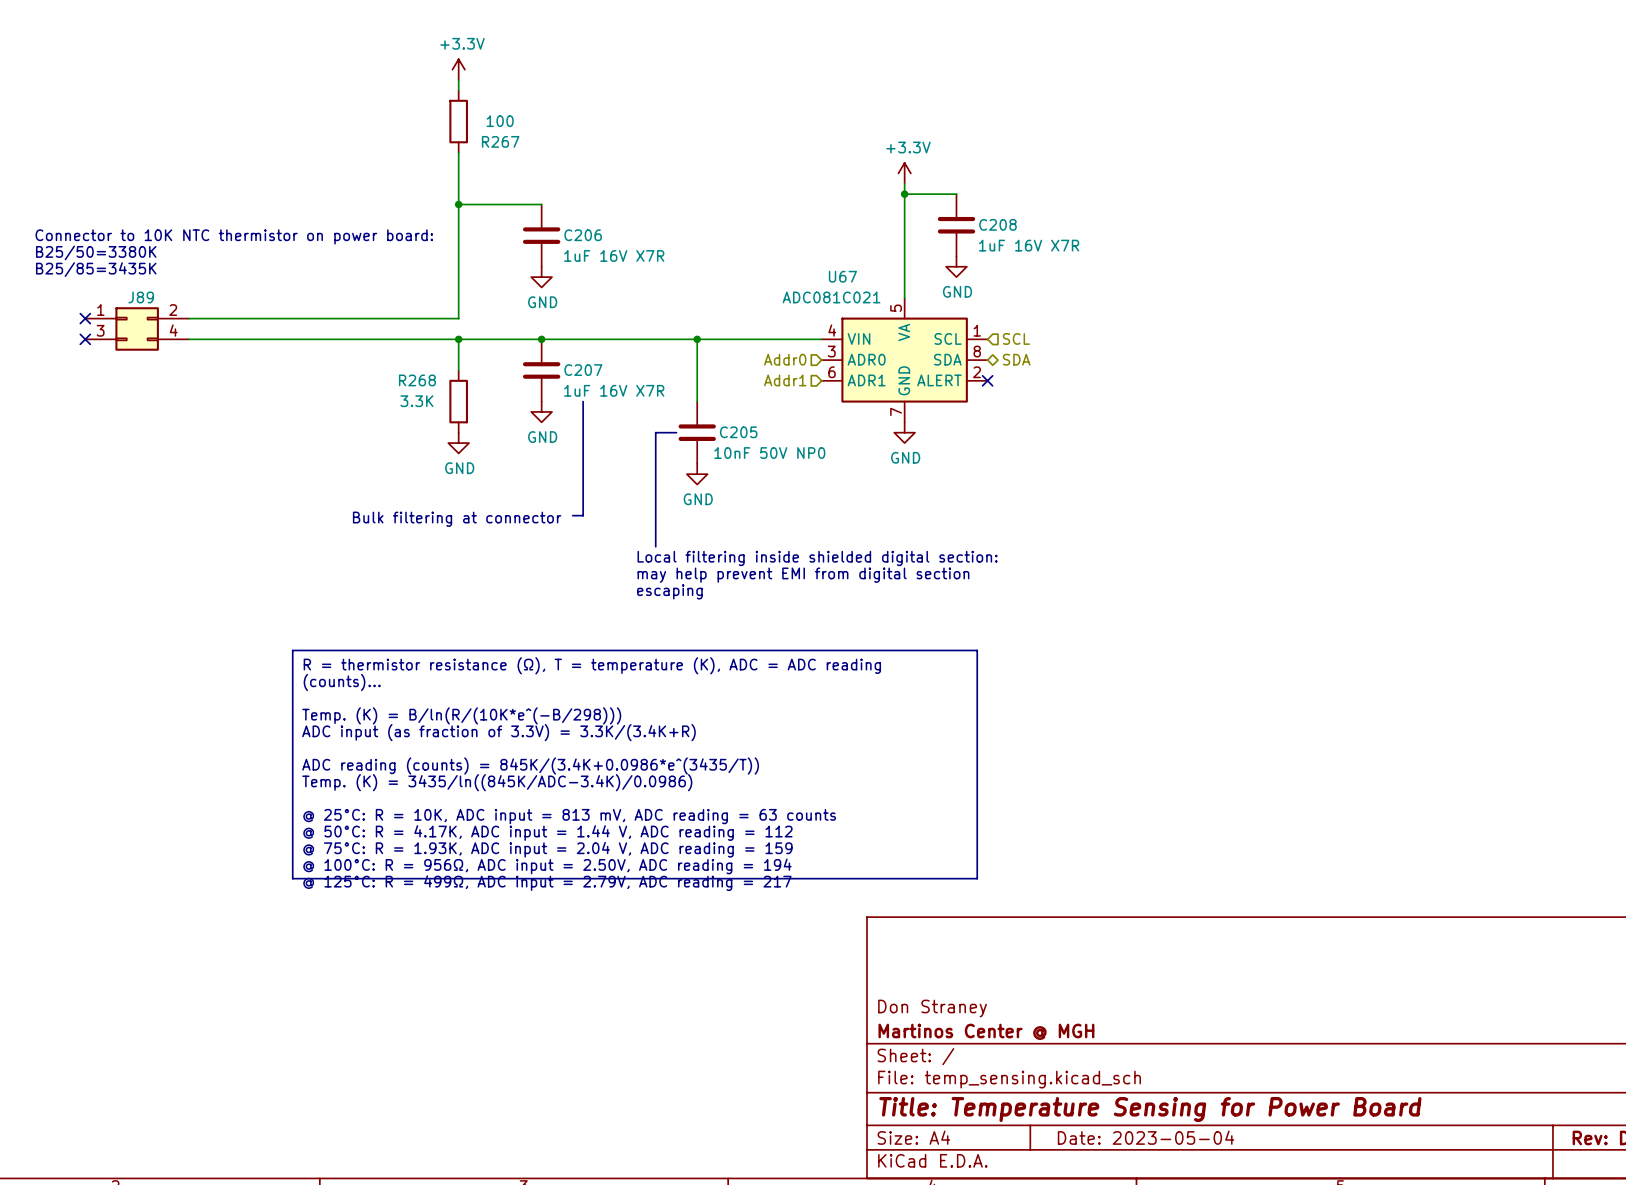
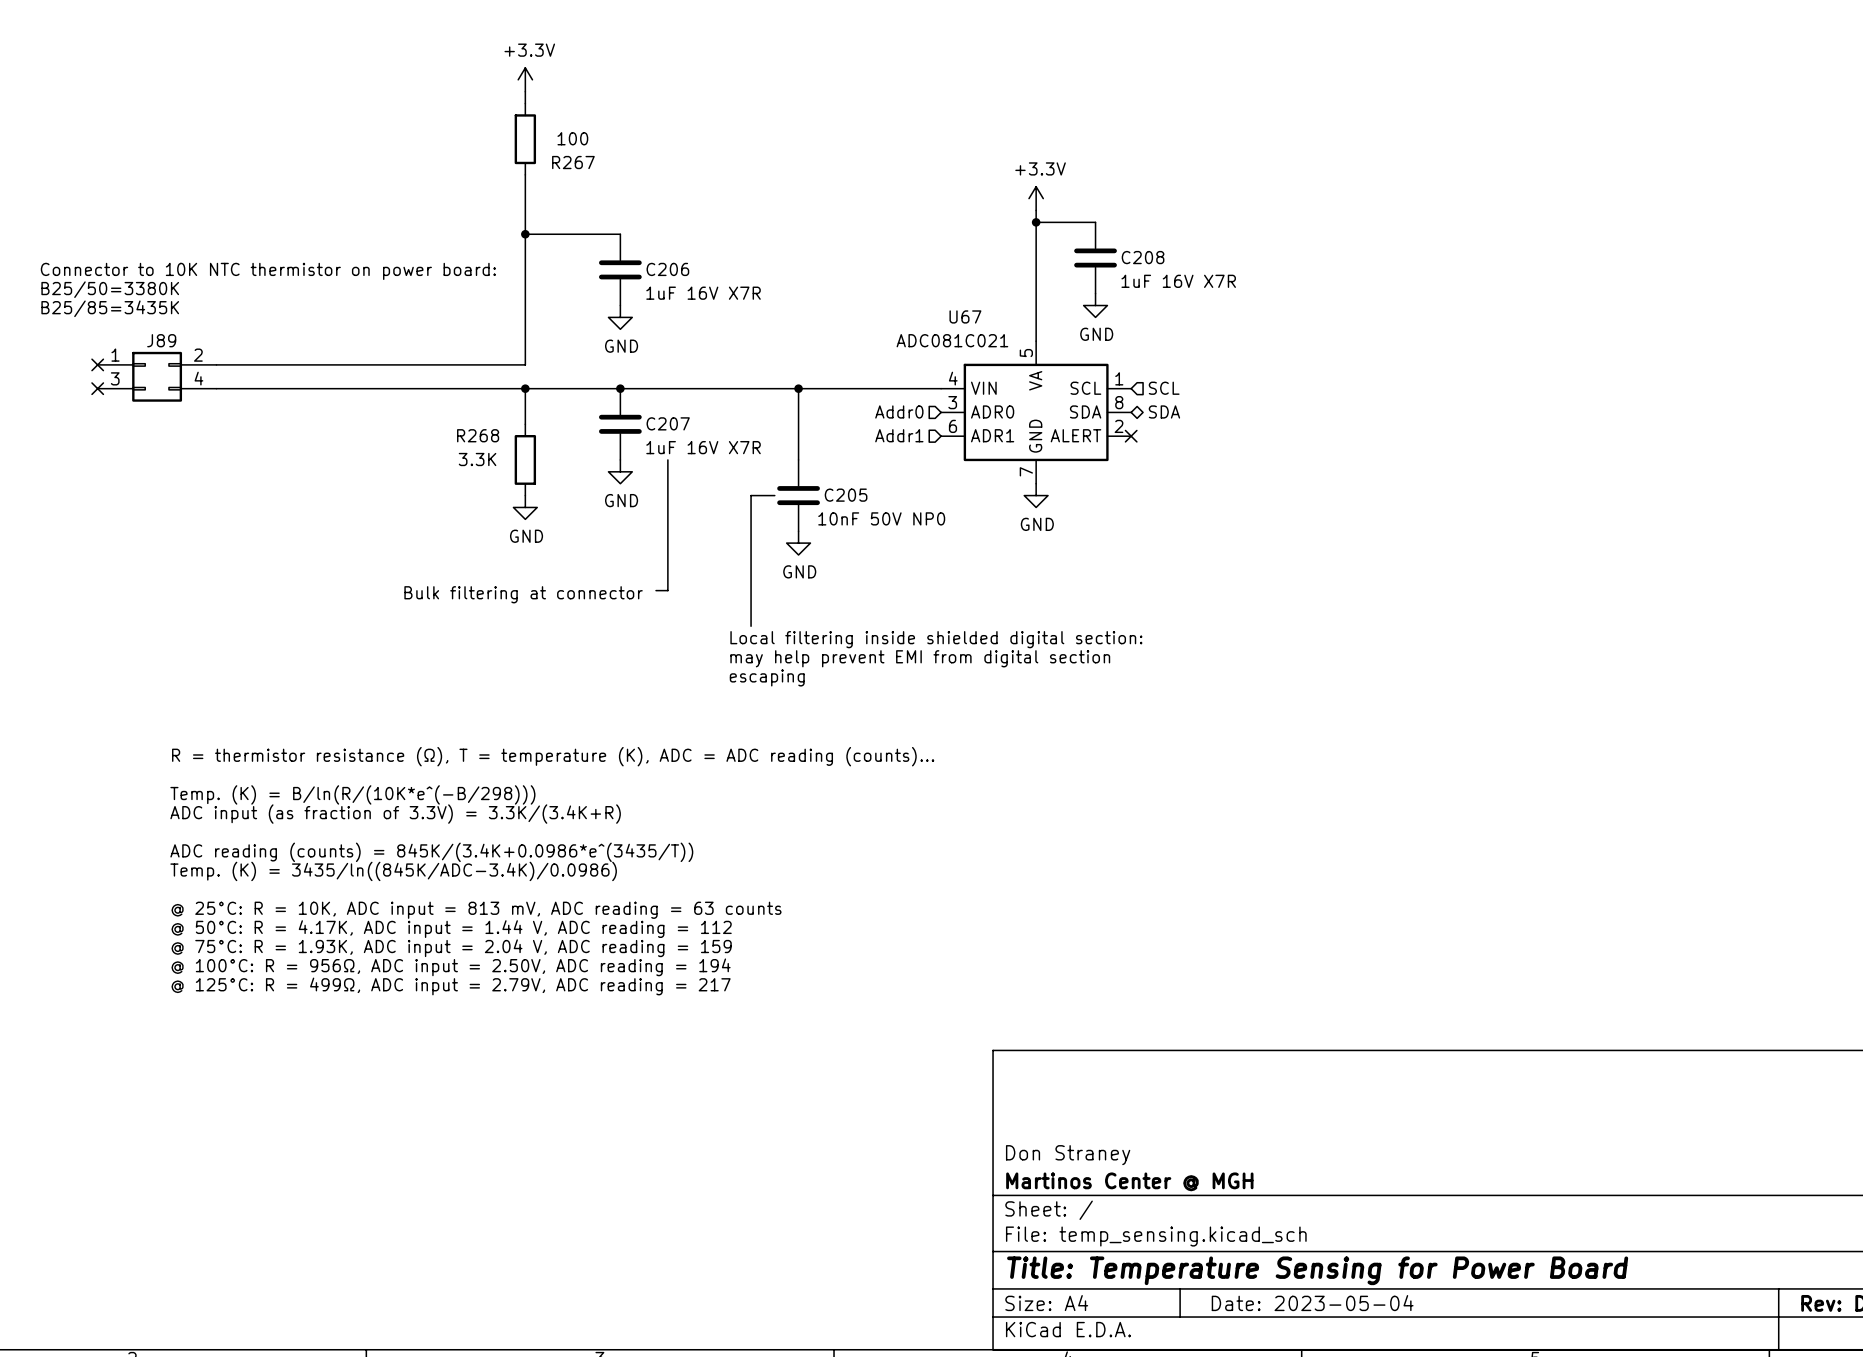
line: (292, 650) (977, 650) (977, 878) (292, 878) (292, 650) -> none
text: R = thermistor resistance (Ω), T = temperature (K), ADC = ADC reading (592, 665) -> R = thermistor resistance (Ω), T = temperature (K), ADC = ADC reading (counts)... (553, 756)
text: (counts)... (342, 682) -> none
text position: Temp. (K) = B/ln(R/(10K*e^(-B/298))) (461, 715) -> Temp. (K) = B/ln(R/(10K*e^(-B/298))) (352, 794)
text position: ADC input (as fraction of 3.3V) = 3.3K/(3.4K+R) (499, 732) -> ADC input (as fraction of 3.3V) = 3.3K/(3.4K+R) (395, 814)
text position: ADC reading (counts) = 845K/(3.4K+0.0986*e^(3435/T)) (530, 765) -> ADC reading (counts) = 845K/(3.4K+0.0986*e^(3435/T)) (431, 852)
text position: Temp. (K) = 3435/ln((845K/ADC-3.4K)/0.0986) (497, 782) -> Temp. (K) = 3435/ln((845K/ADC-3.4K)/0.0986) (393, 871)
text position: @ 25°C: R = 10K, ADC input = 813 mV, ADC reading = 63 counts (569, 816) -> @ 25°C: R = 10K, ADC input = 813 mV, ADC reading = 63 counts (476, 910)
text position: @ 50°C: R = 4.17K, ADC input = 1.44 V, ADC reading = 112 (547, 833) -> @ 50°C: R = 4.17K, ADC input = 1.44 V, ADC reading = 112 (451, 929)
text position: @ 75°C: R = 1.93K, ADC input = 2.04 V, ADC reading = 159 (547, 849) -> @ 75°C: R = 1.93K, ADC input = 2.04 V, ADC reading = 159 (451, 948)
text position: @ 100°C: R = 956Ω, ADC input = 2.50V, ADC reading = 194 (547, 866) -> @ 100°C: R = 956Ω, ADC input = 2.50V, ADC reading = 194 (451, 967)
text position: @ 125°C: R = 499Ω, ADC input = 2.79V, ADC reading = 217 (547, 883) -> @ 125°C: R = 499Ω, ADC input = 2.79V, ADC reading = 217 (451, 986)

